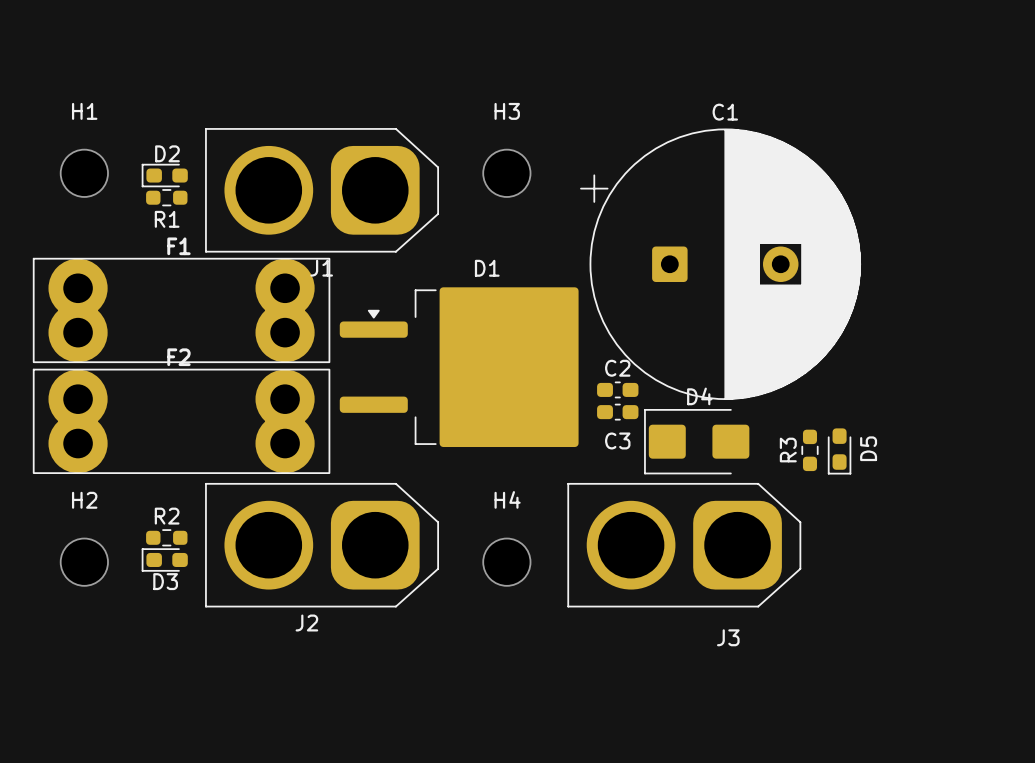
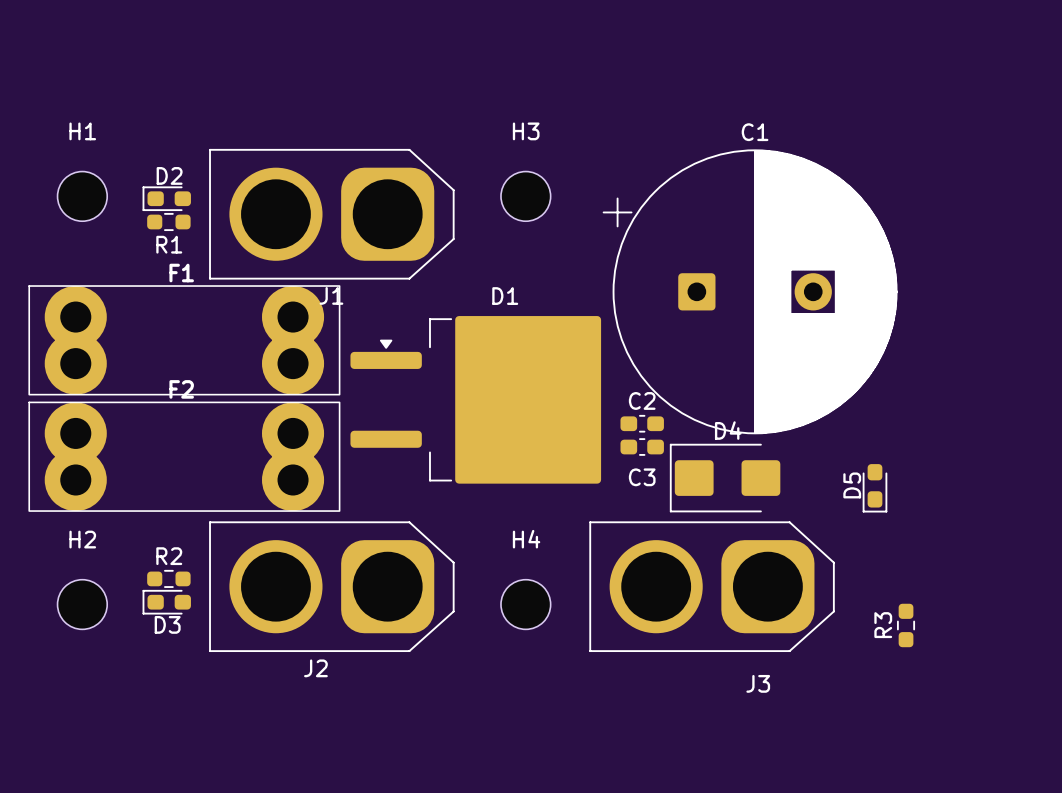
D5 name position: D5 (868, 448) -> D5 (852, 485)
R3 position: (809, 450) -> (906, 625)

